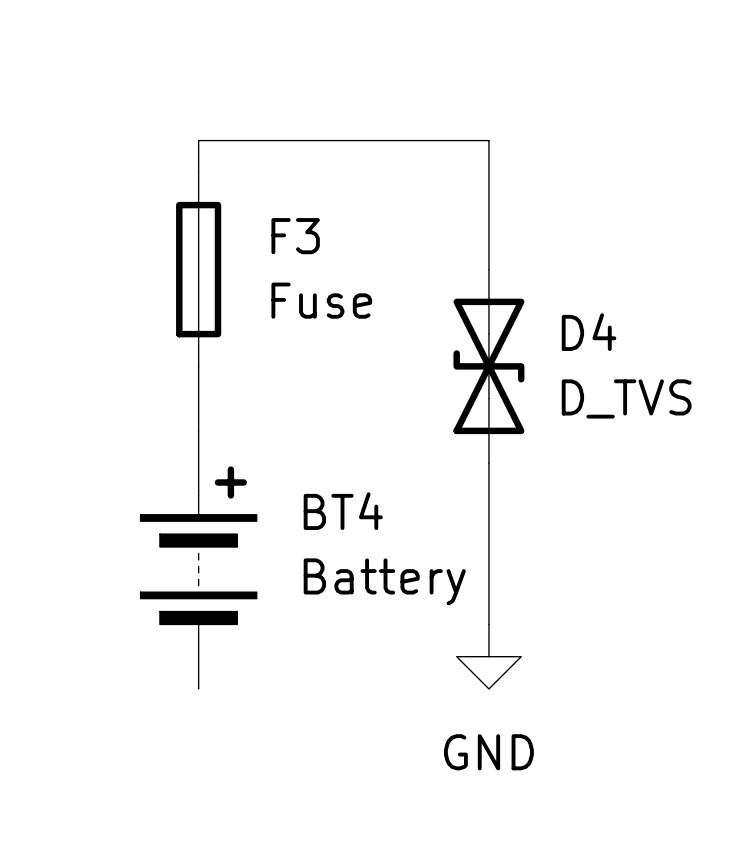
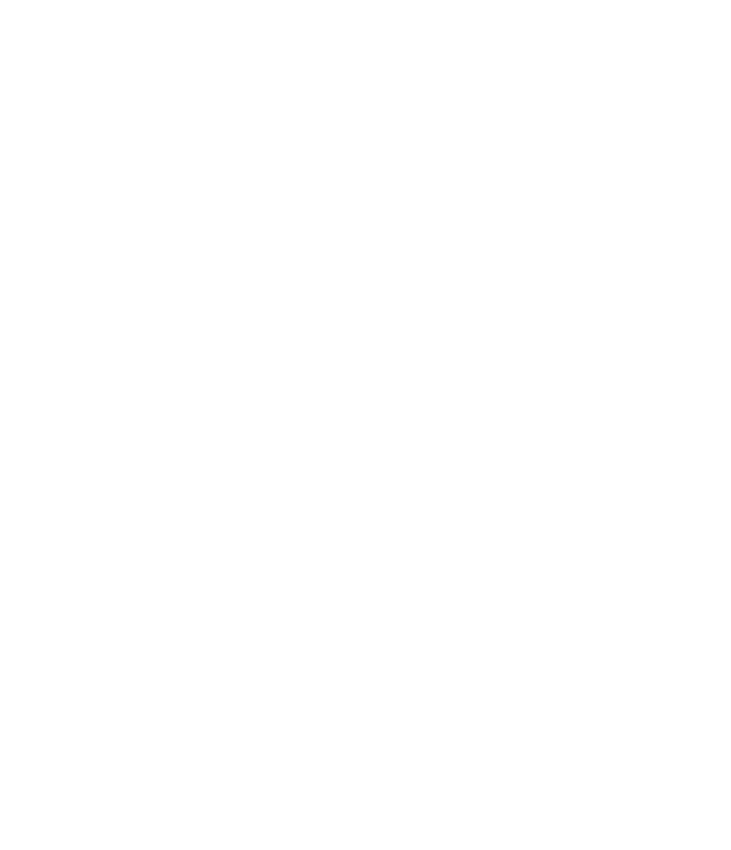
wire: (198, 172) (198, 140) (488, 140) (488, 269) -> none
F3: Fuse (198, 269) -> none
wire: (198, 366) (198, 430) -> none
D4: D_TVS (488, 366) -> none
wire: (488, 463) (488, 624) -> none
BT4: Battery (198, 559) -> none
power symbol: GND (488, 656) -> none

